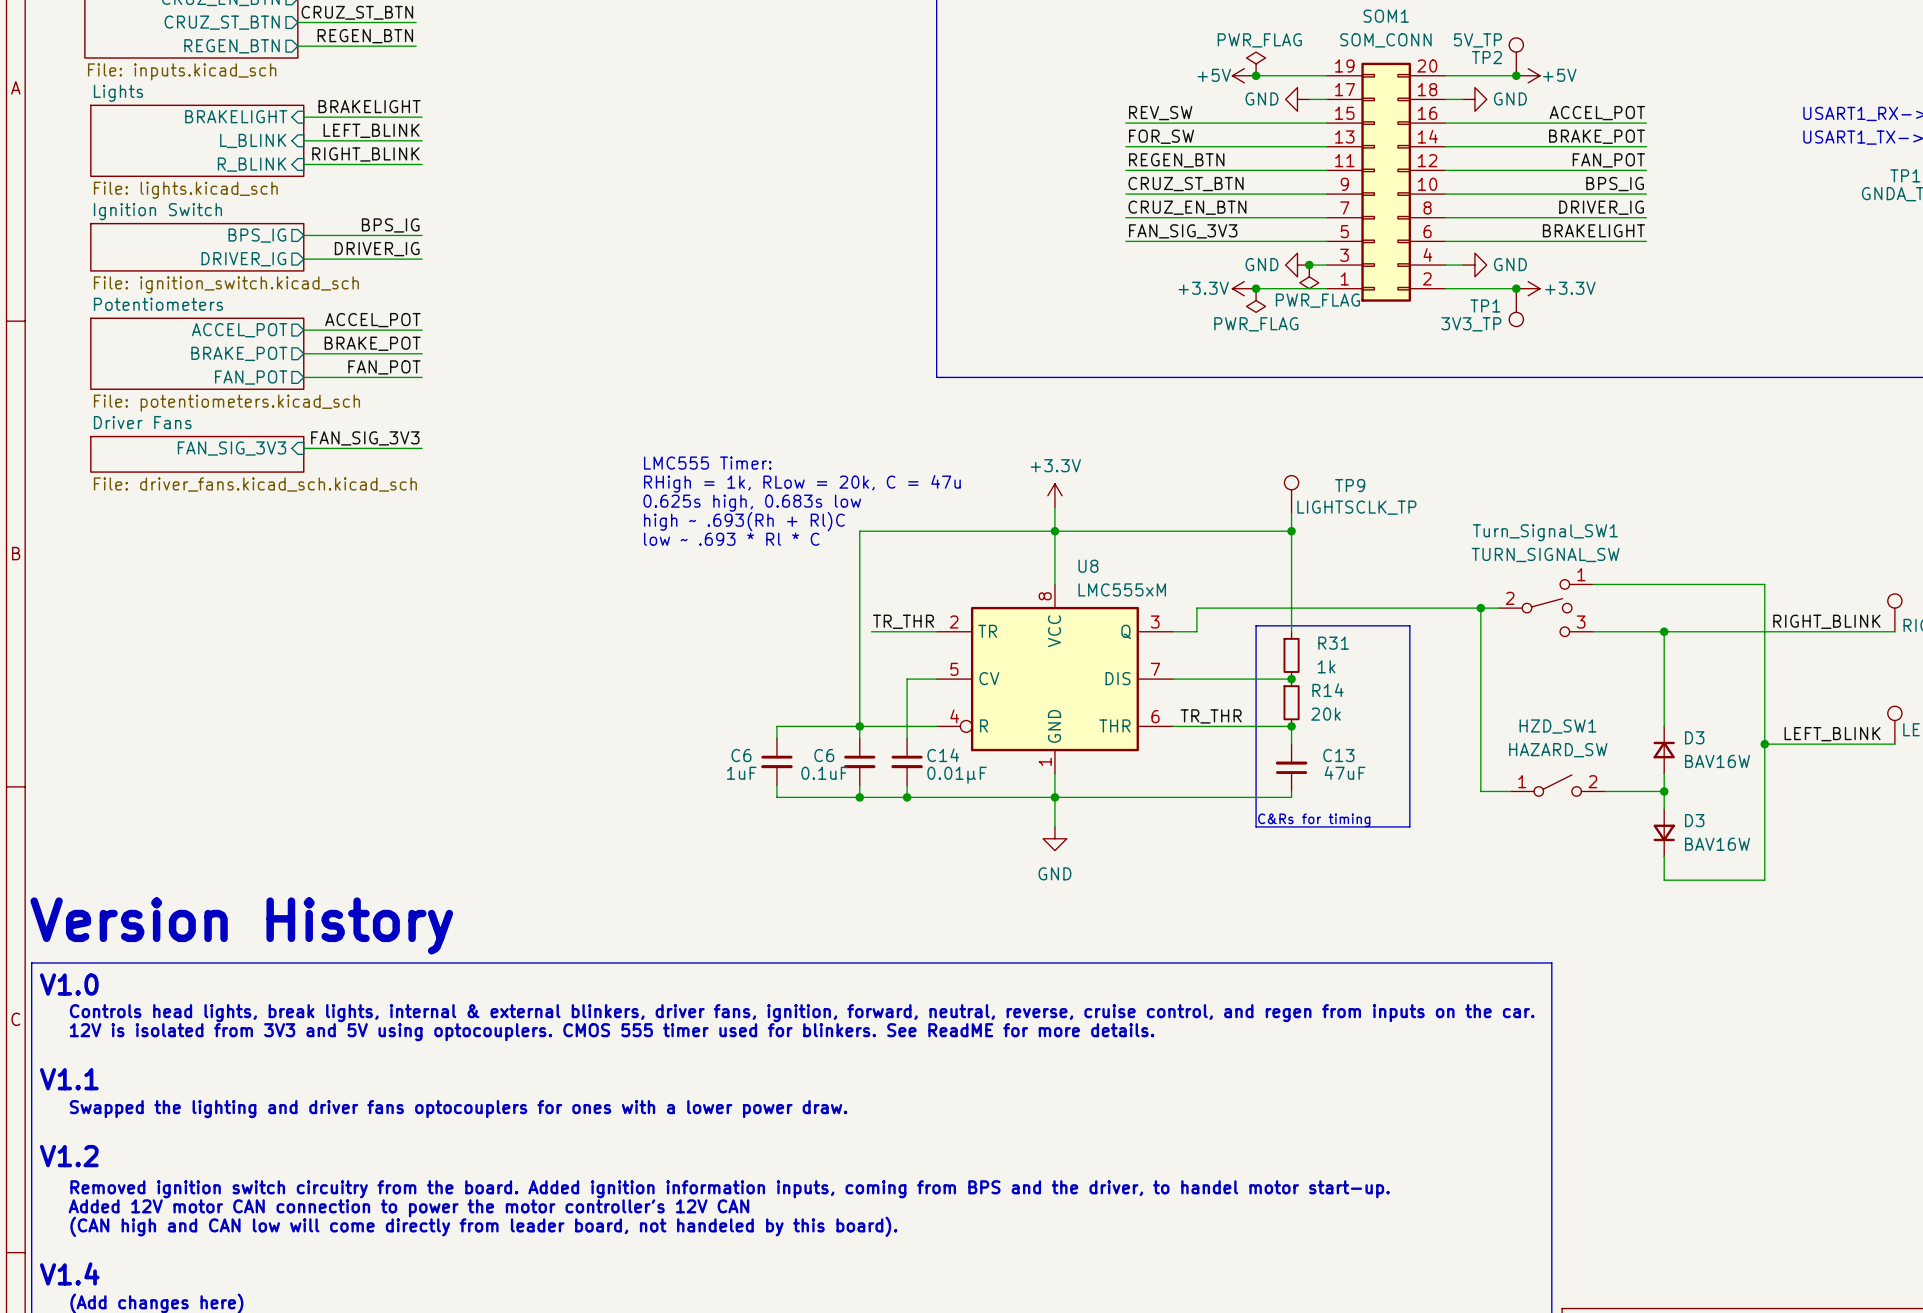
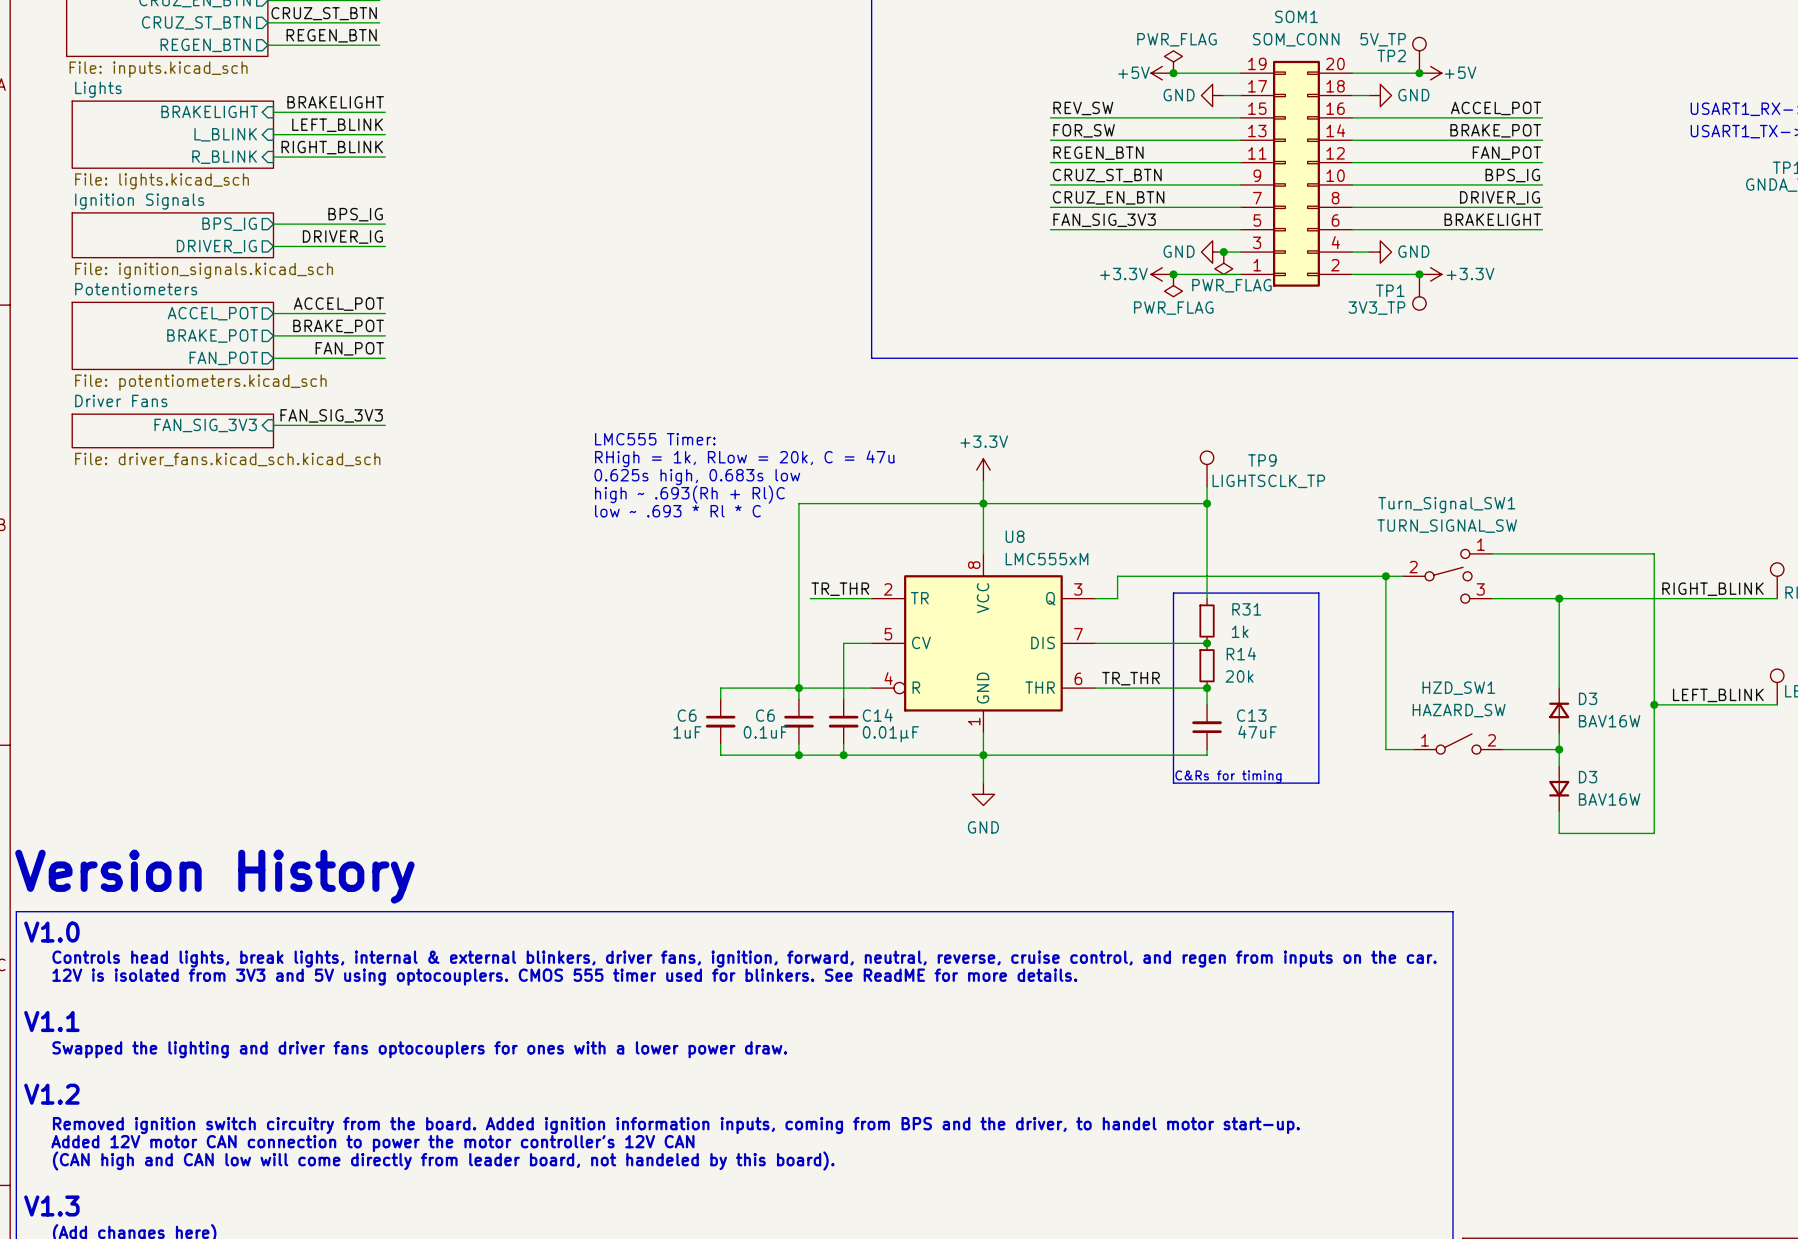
sheet Ignition Switch name: Ignition Switch (157, 211) -> Ignition Signals (139, 201)
sheet Ignition Switch value: File: ignition_switch.kicad_sch (226, 284) -> File: ignition_signals.kicad_sch (204, 270)
text: V1.4 (69, 1273) -> V1.3 (51, 1205)

